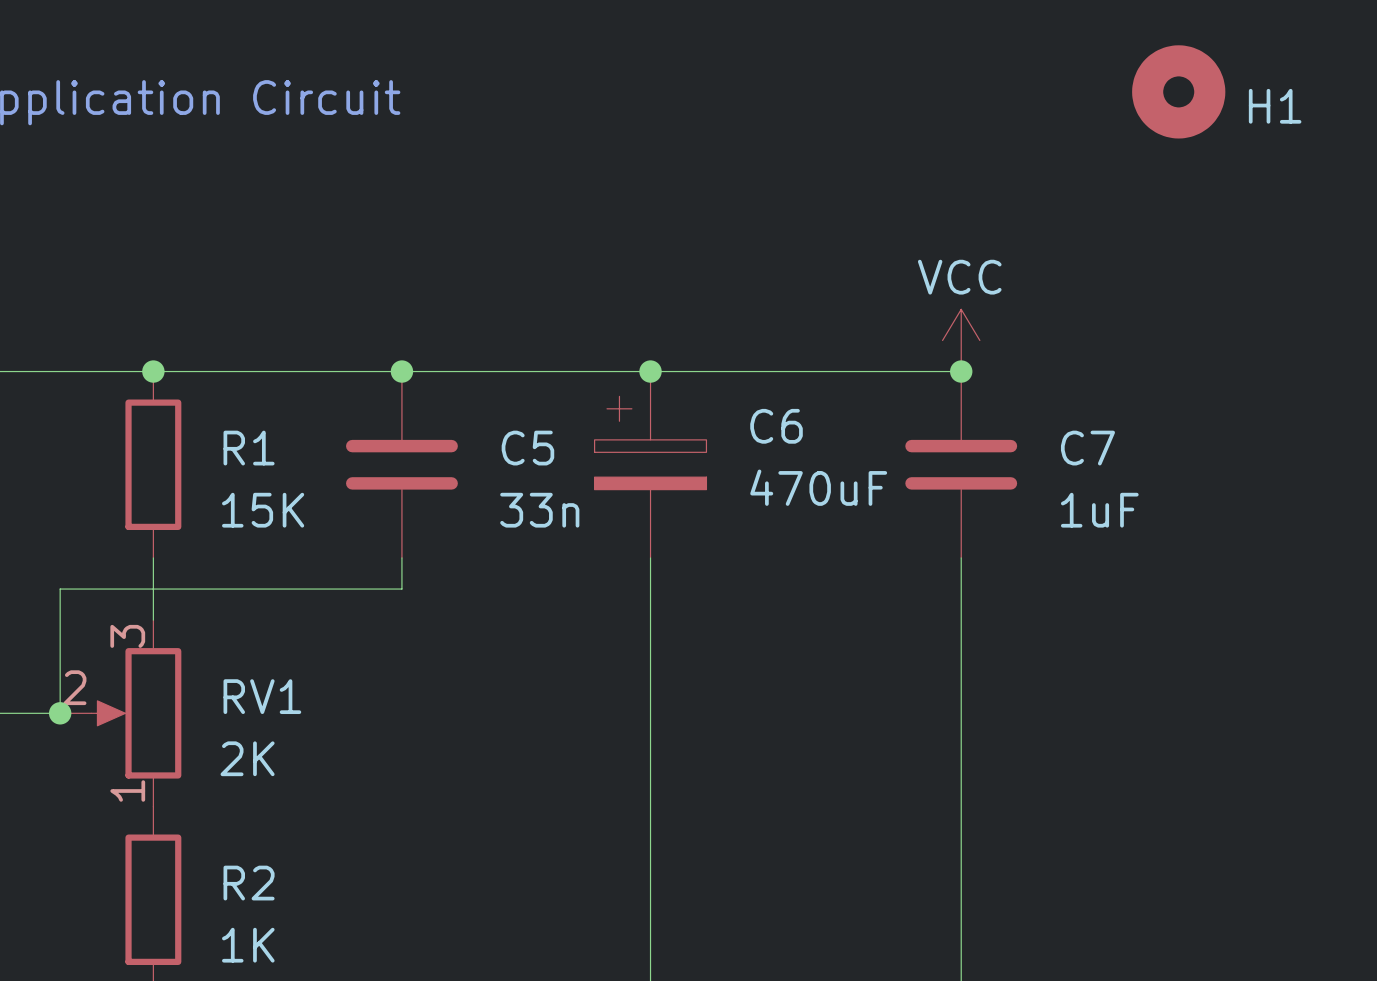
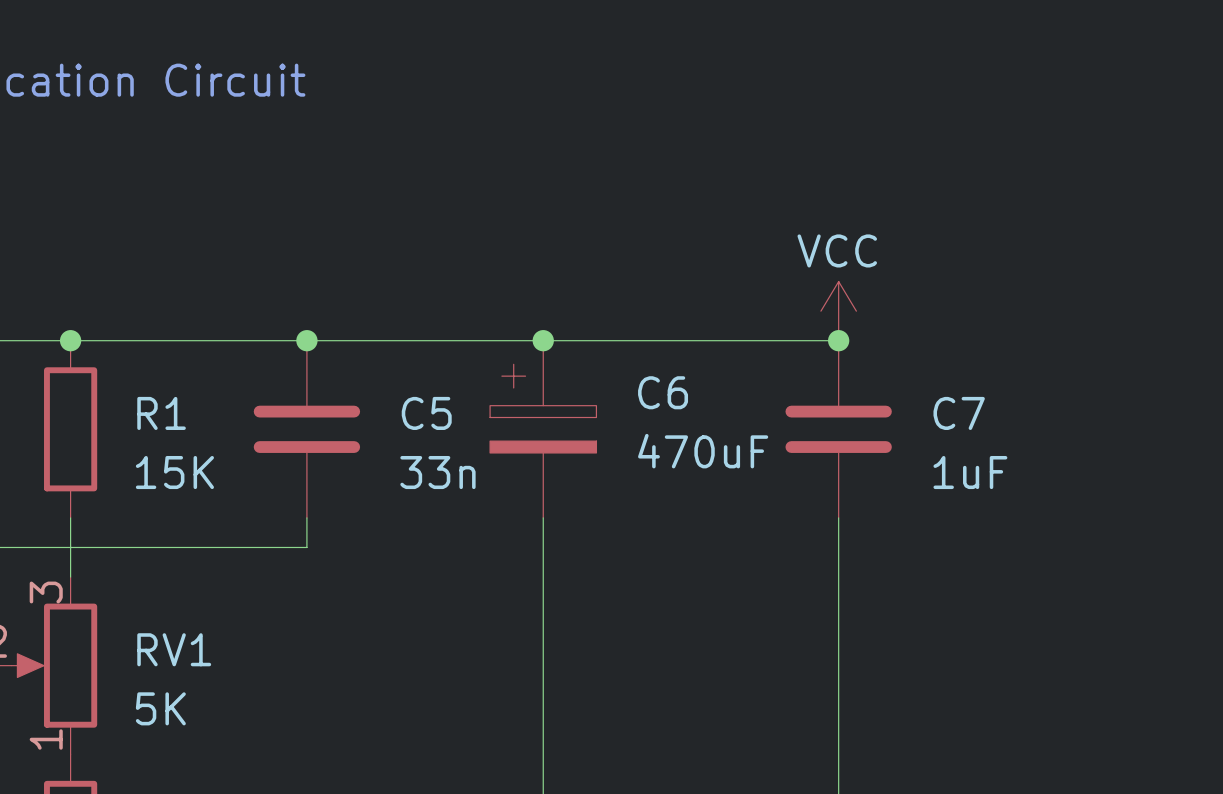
H1: (1178, 91) -> none
RV1 value: 2K (247, 758) -> 5K (160, 708)

